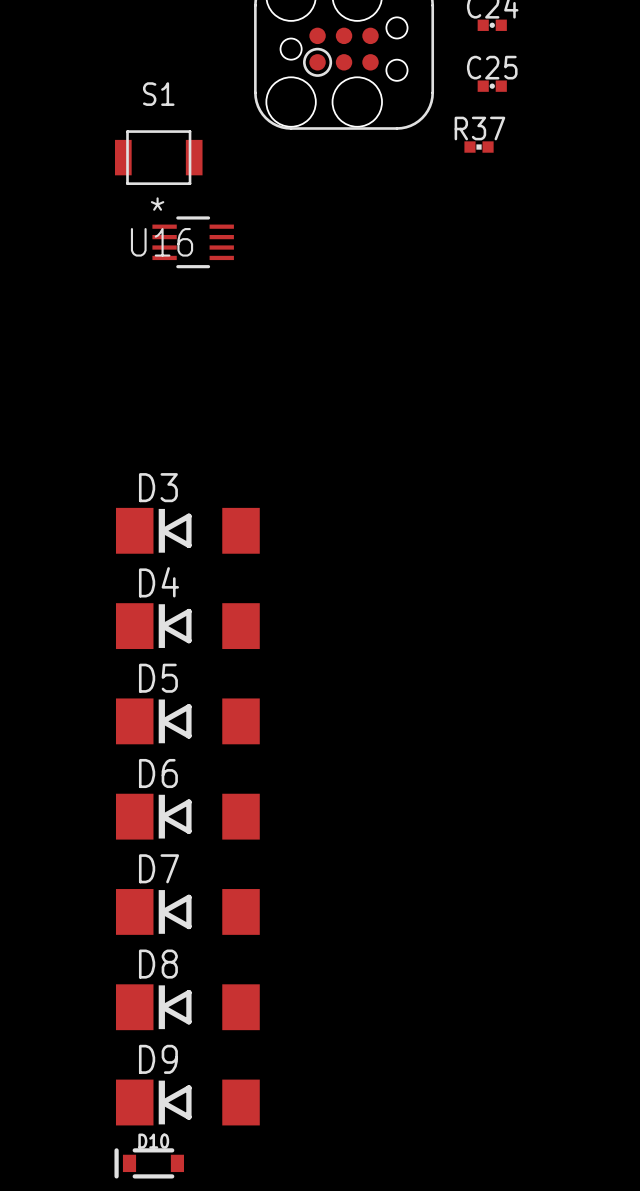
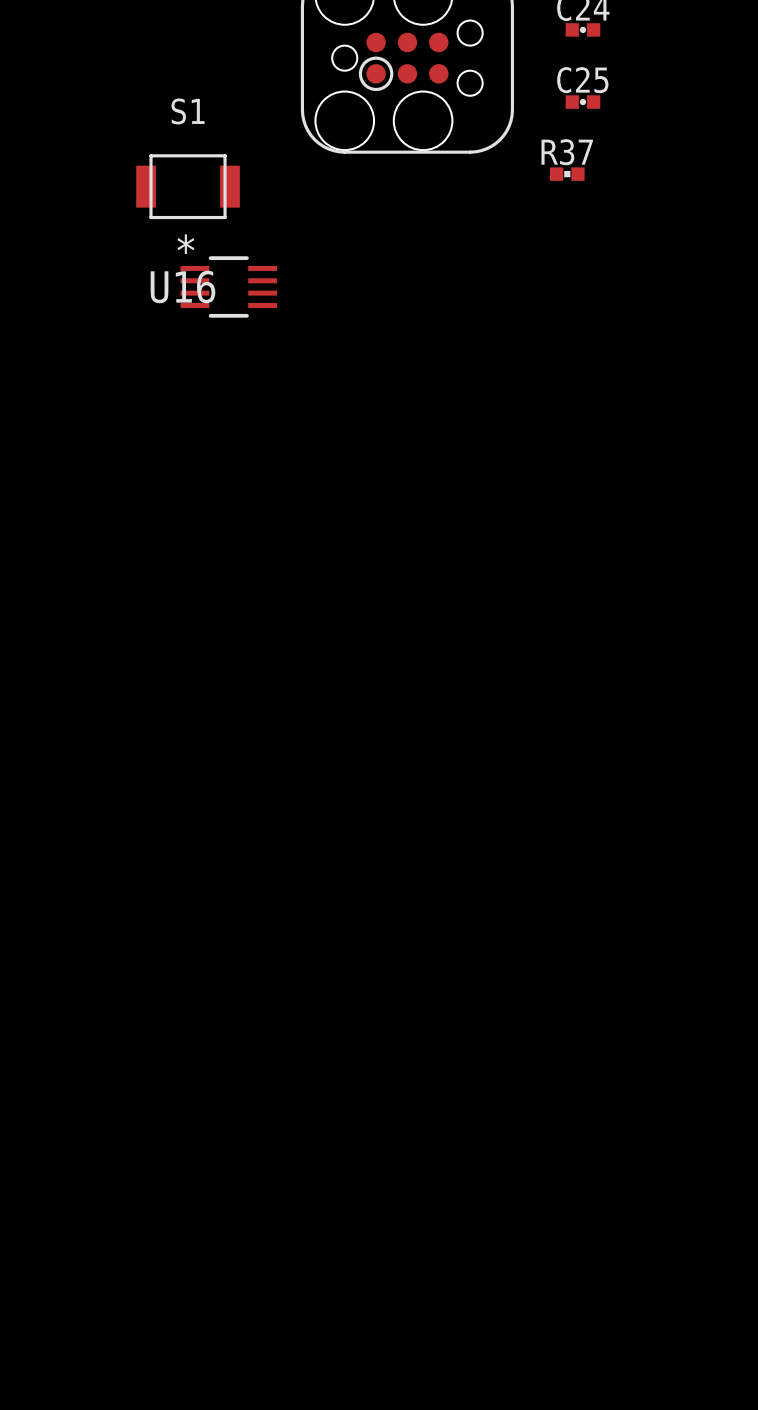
D3: (187, 530) -> none
D4: (187, 626) -> none
D5: (187, 721) -> none
D6: (187, 816) -> none
D7: (187, 911) -> none
D8: (187, 1007) -> none
D9: (187, 1102) -> none
D10: (149, 1163) -> none

